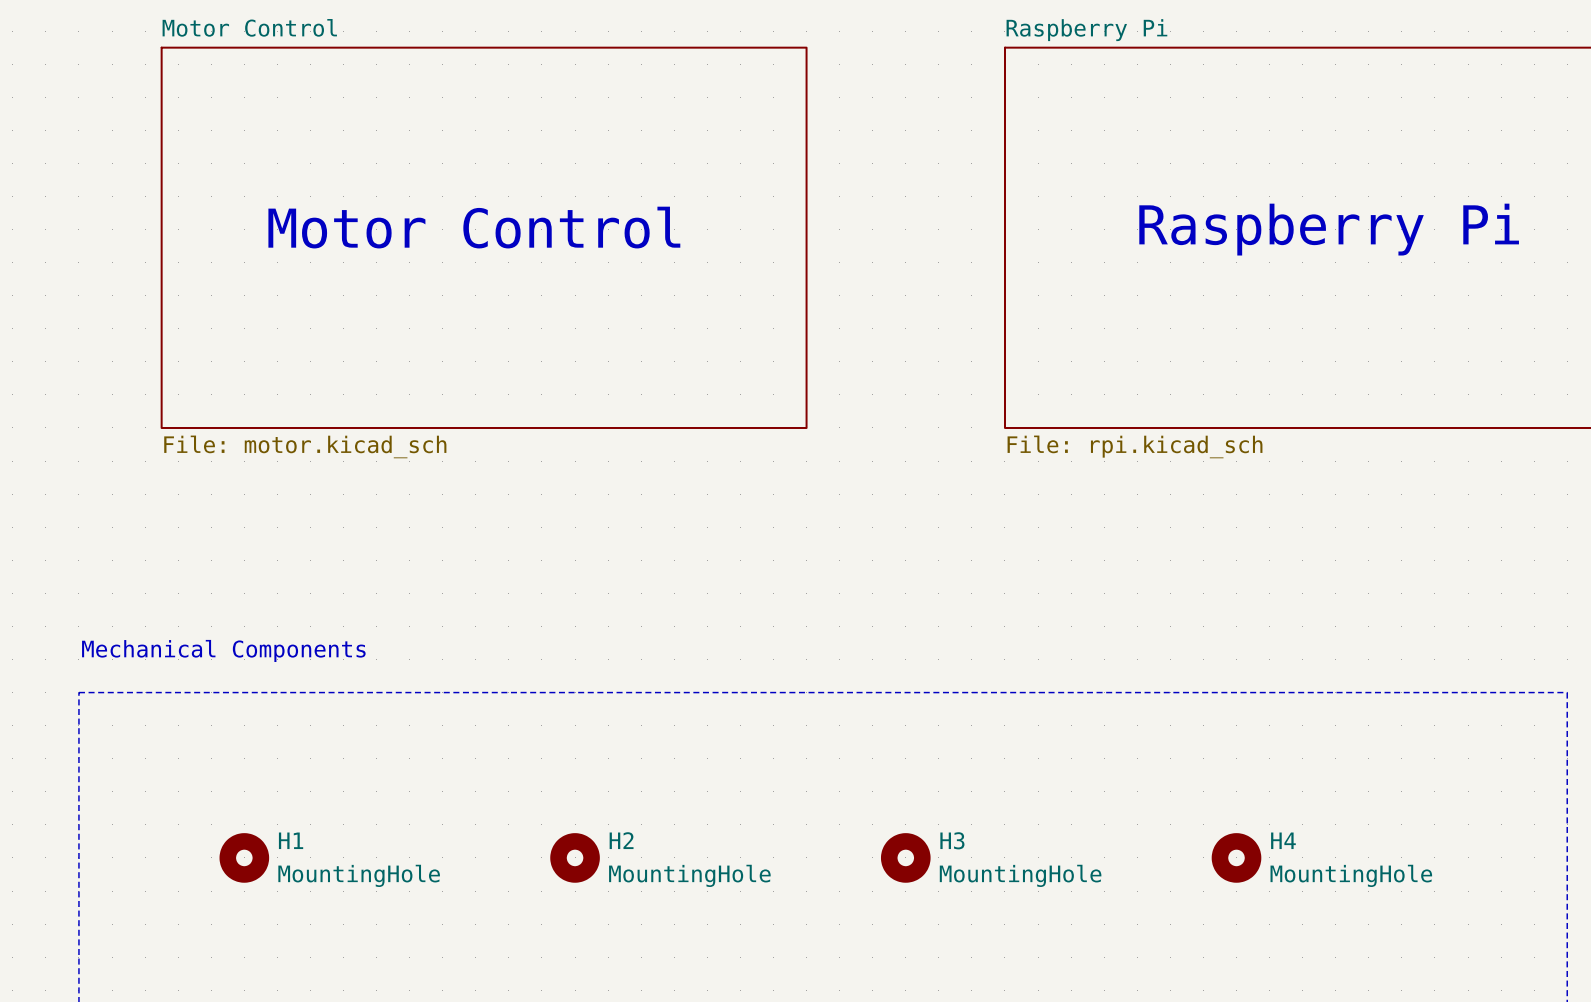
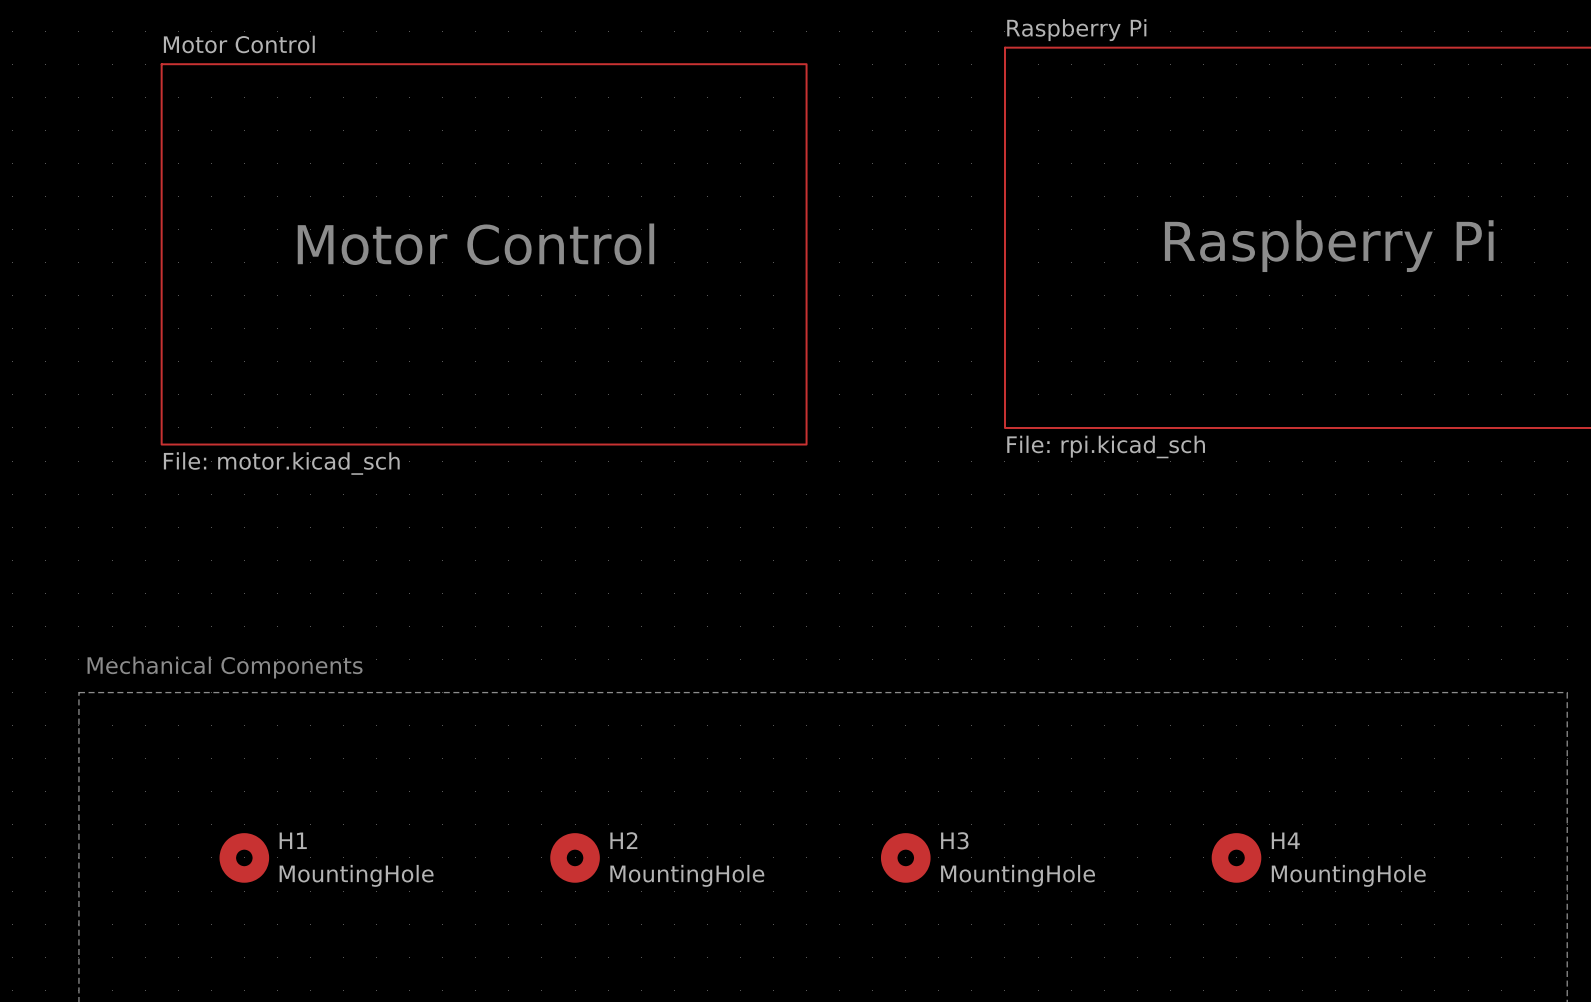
text position: Motor Control (474, 227) -> Motor Control (475, 244)
text position: Raspberry Pi (1329, 229) -> Raspberry Pi (1329, 246)
sheet Motor Control position: (484, 237) -> (484, 254)
text position: Mechanical Components (223, 650) -> Mechanical Components (225, 667)

